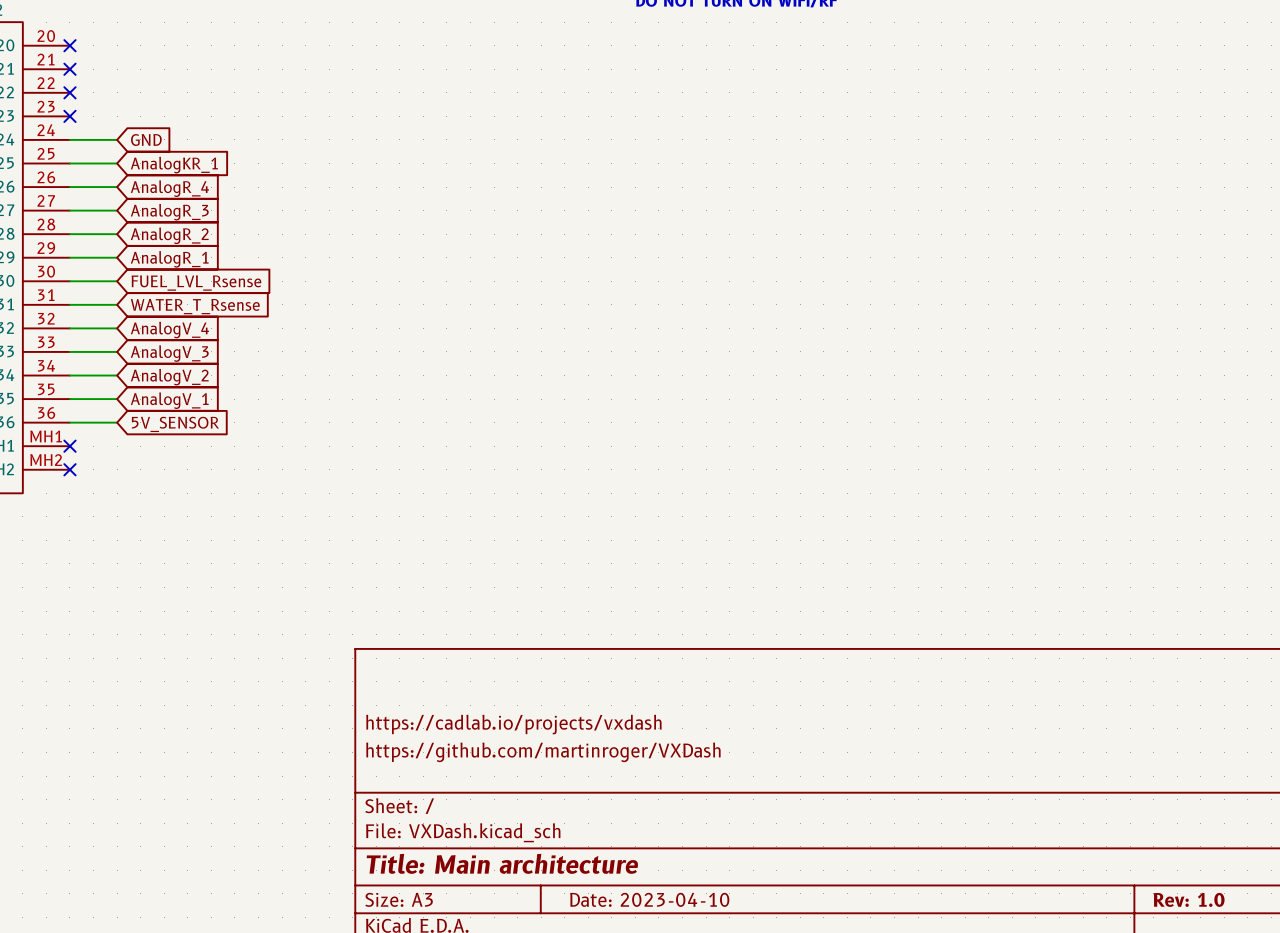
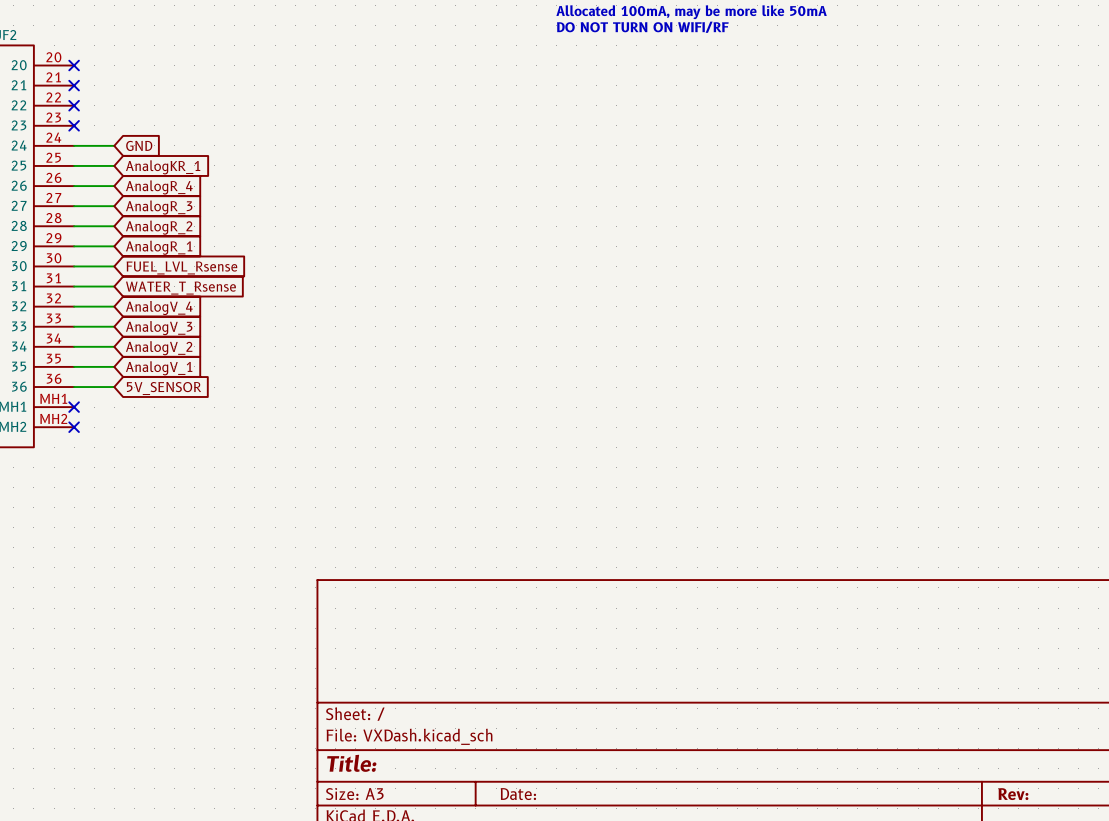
title block: https://cadlab.io/projects/vxdash (513, 724) -> none
title block: https://github.com/martinroger/VXDash (543, 752) -> none
title block: Title: Main architecture (502, 863) -> Title: (351, 763)
title block: Date: 2023-04-10 (649, 899) -> Date: (518, 794)
title block: Rev: 1.0 (1189, 899) -> Rev: (1013, 794)

